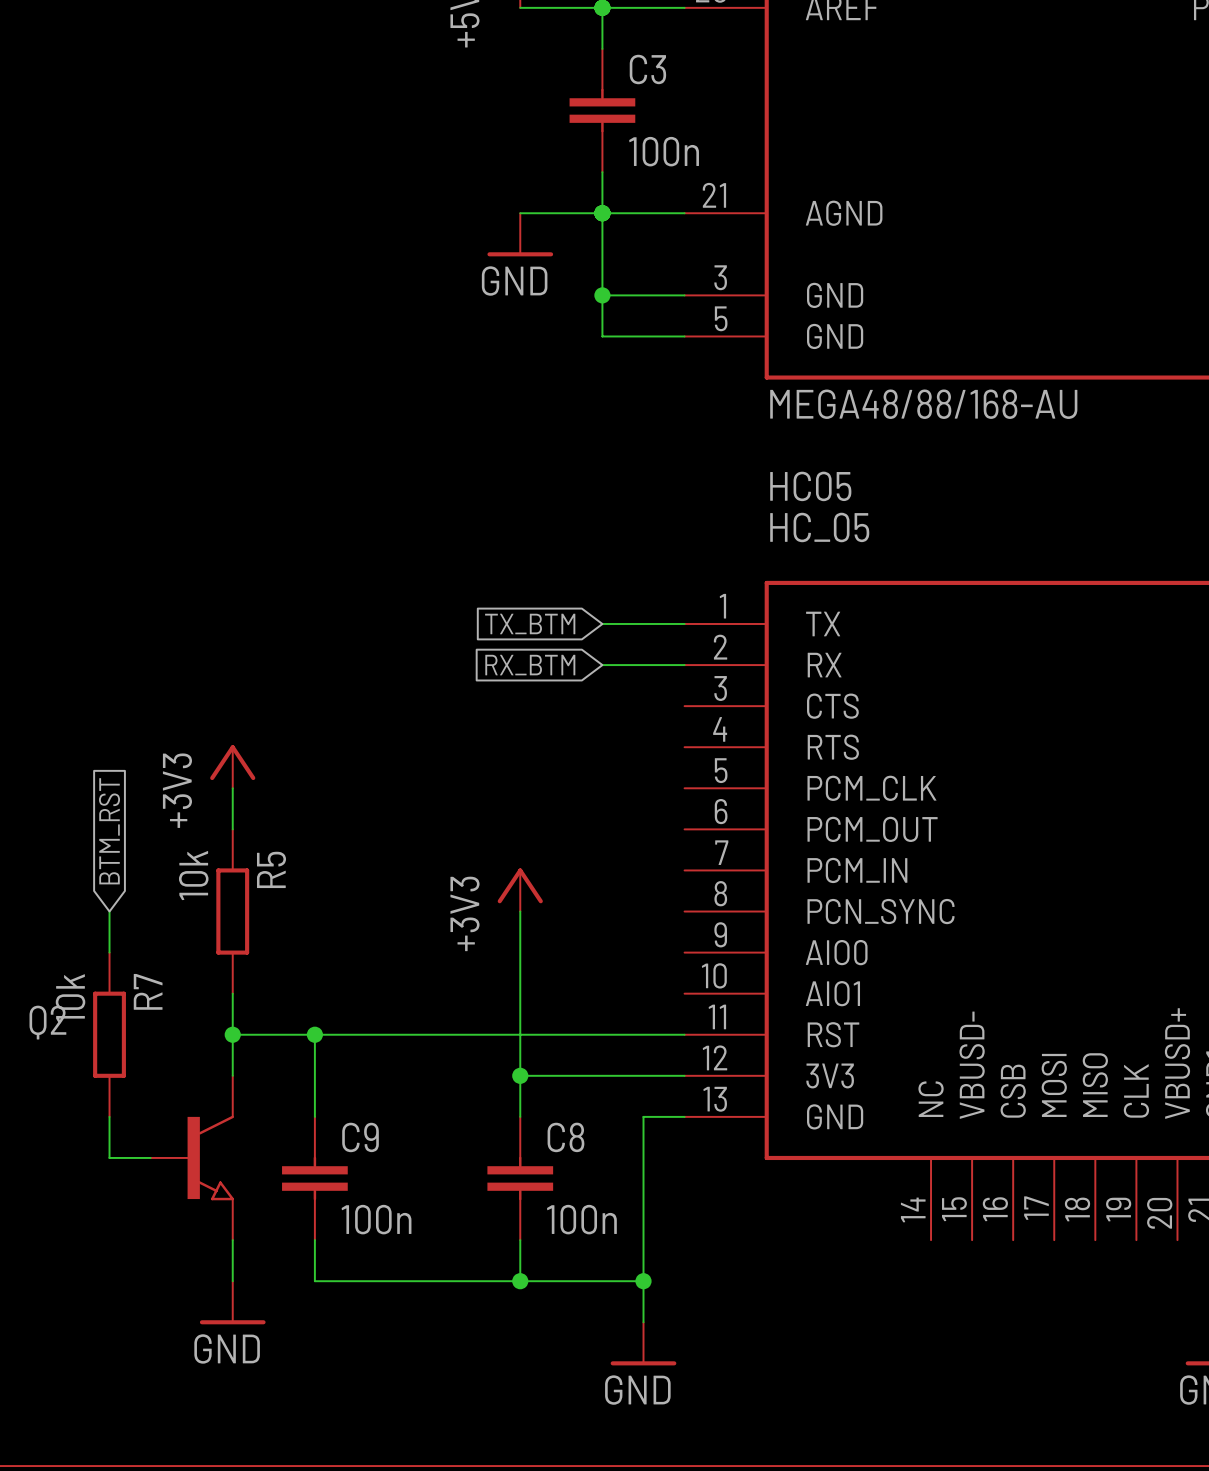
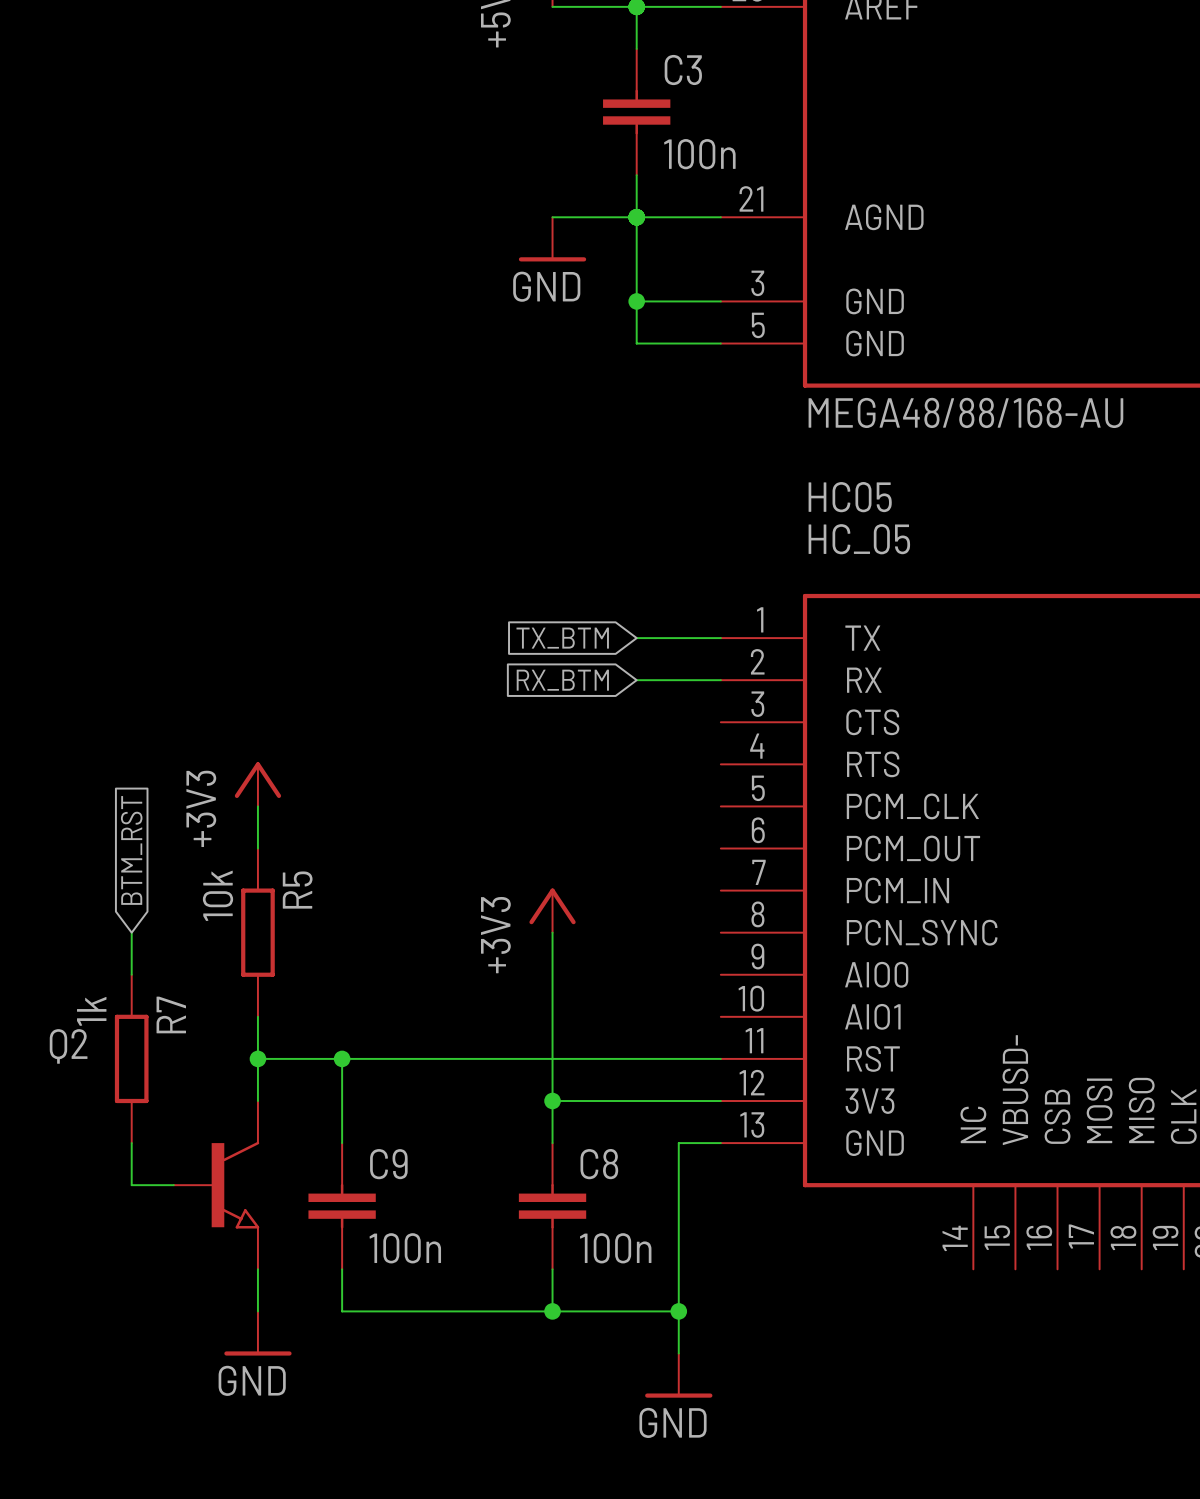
R7 value: 10k (70, 998) -> 1k (91, 1011)

